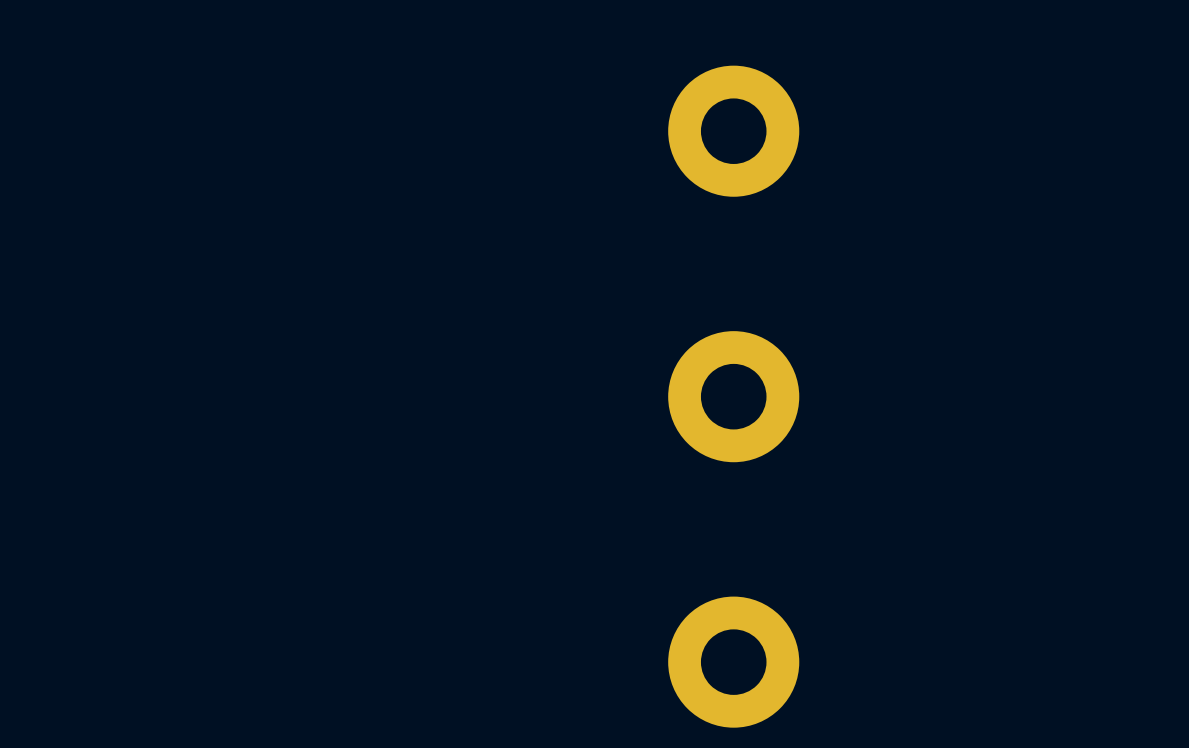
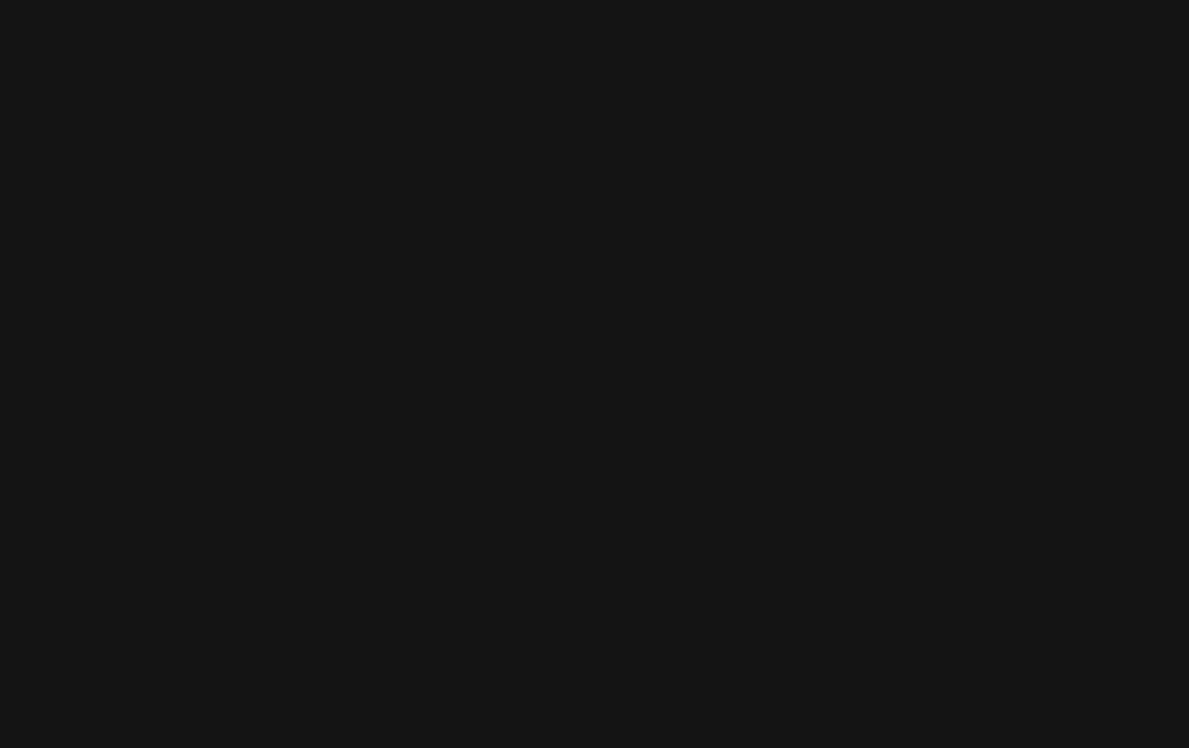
part: (733, 131) -> none
part: (733, 396) -> none
part: (733, 662) -> none

